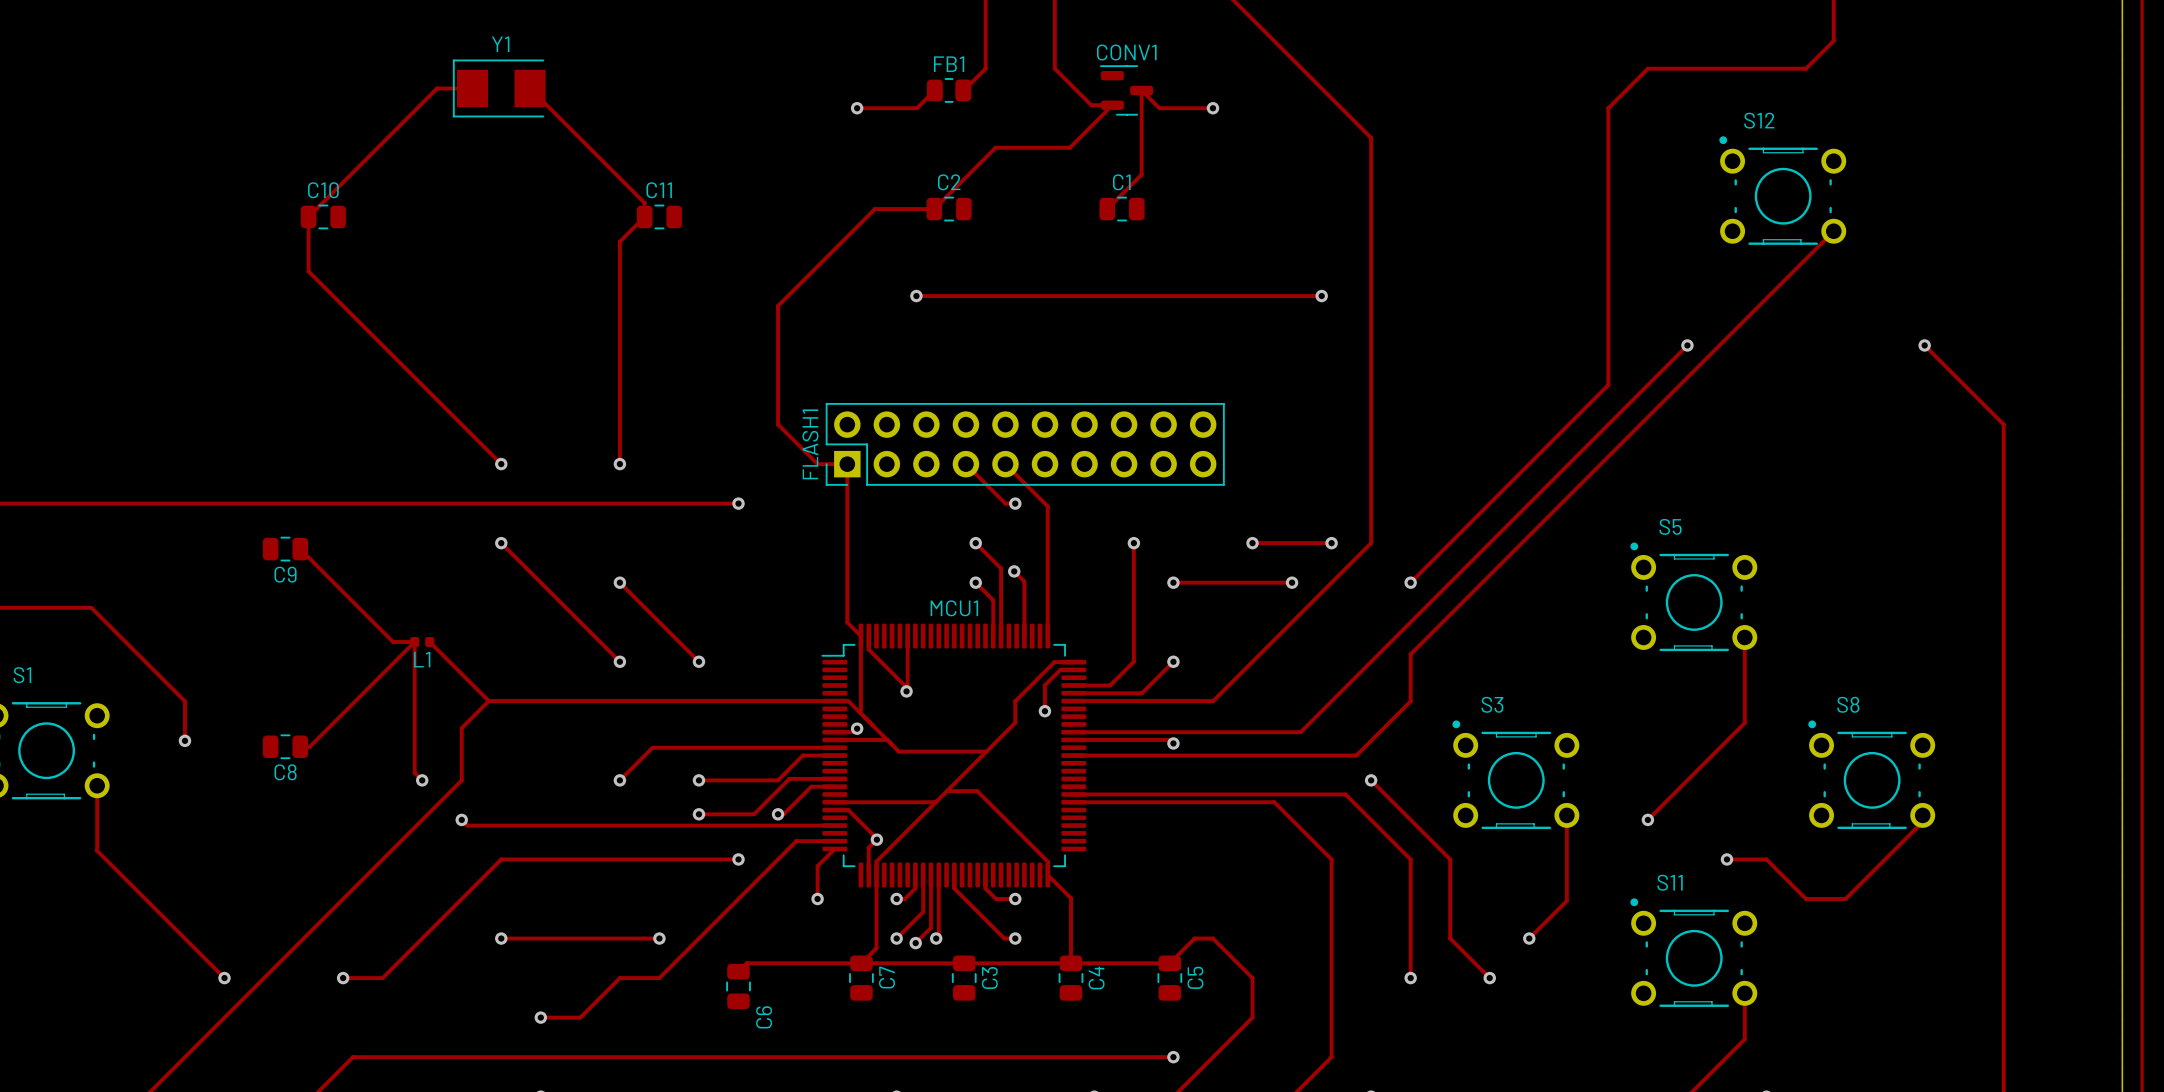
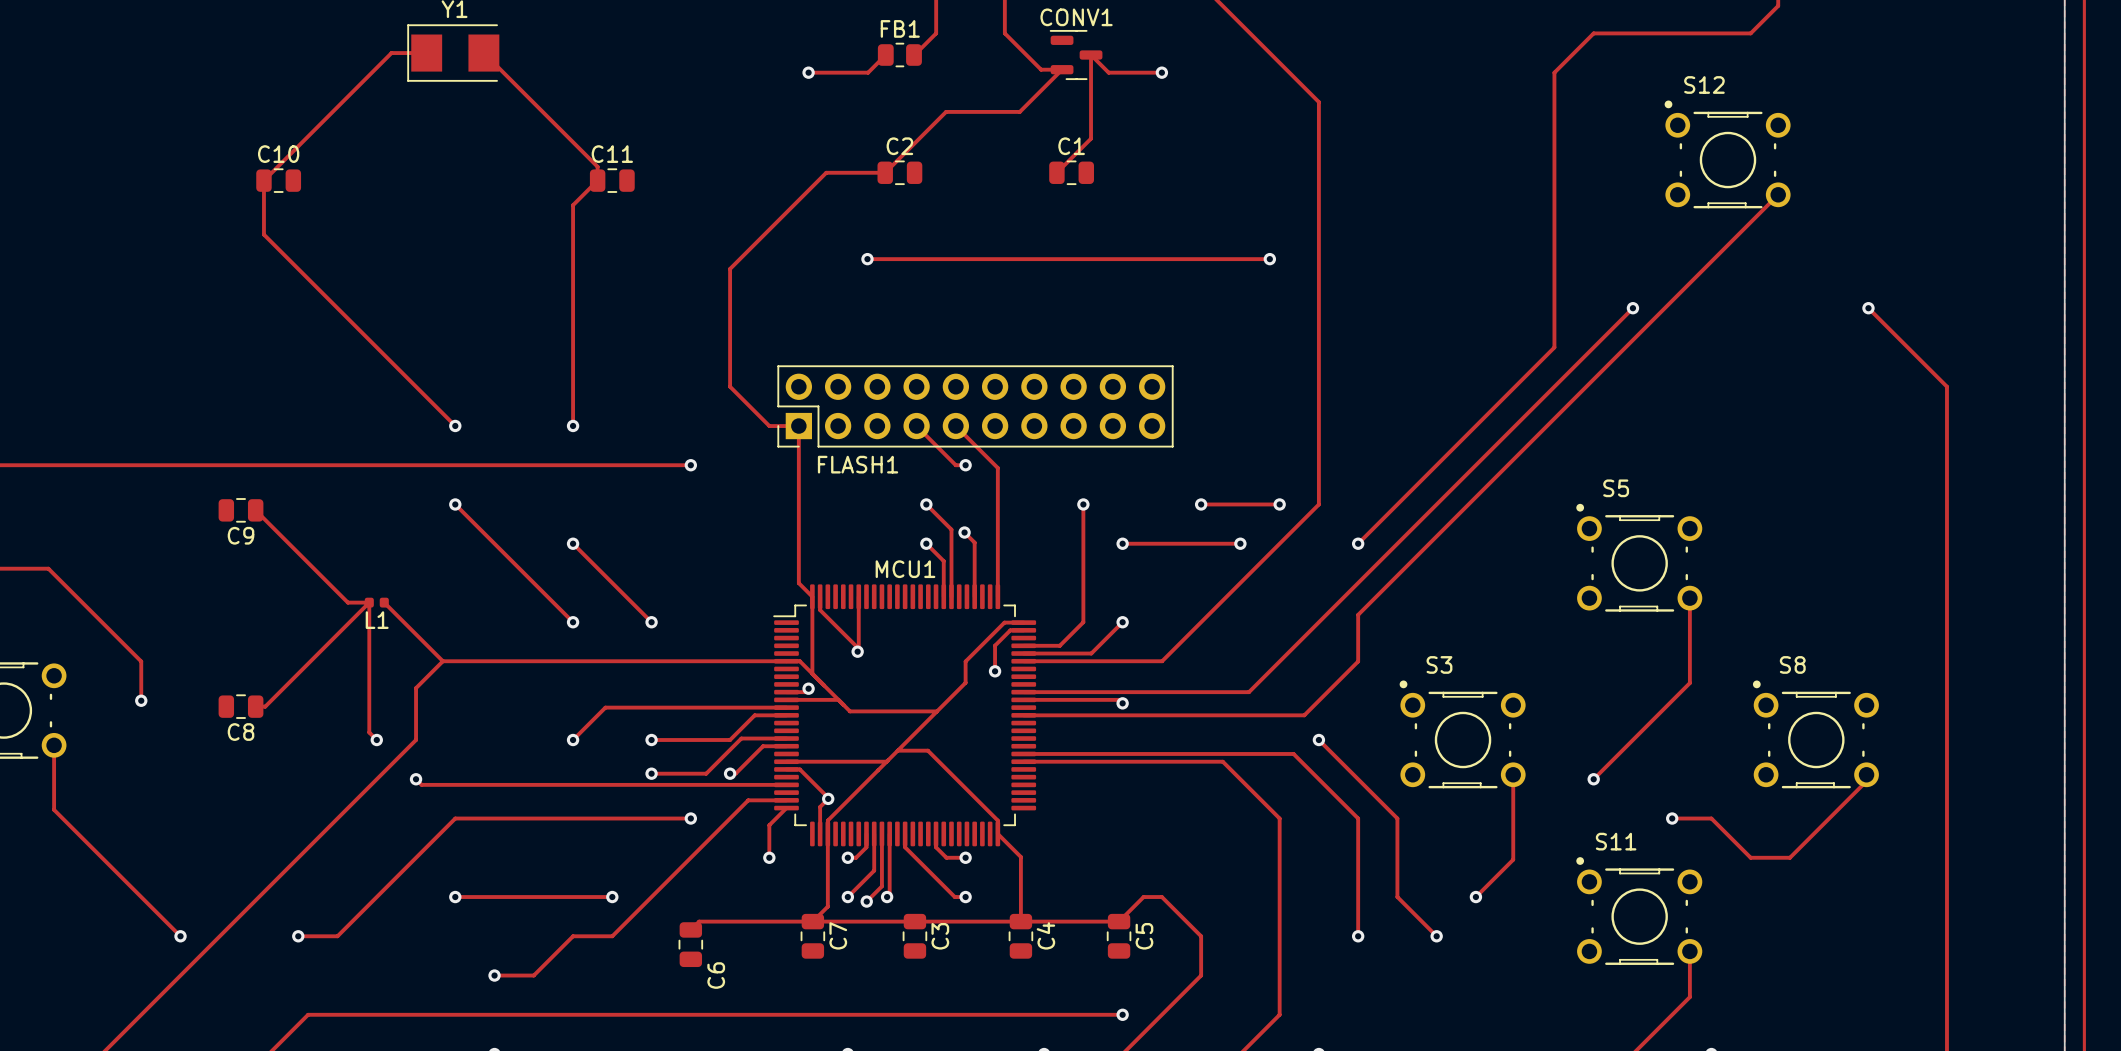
FLASH1 name rotation: 0° (810, 444) -> 90° clockwise (858, 464)
FLASH1 name position: FLASH1 (810, 444) -> FLASH1 (858, 464)

